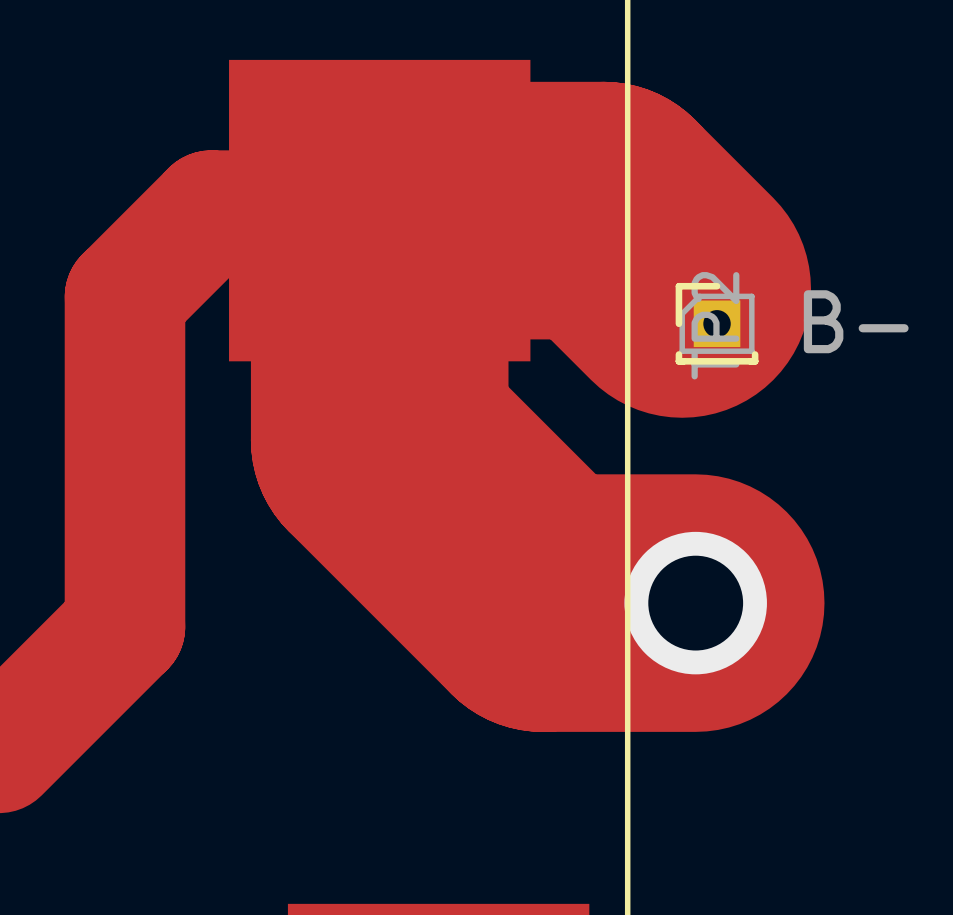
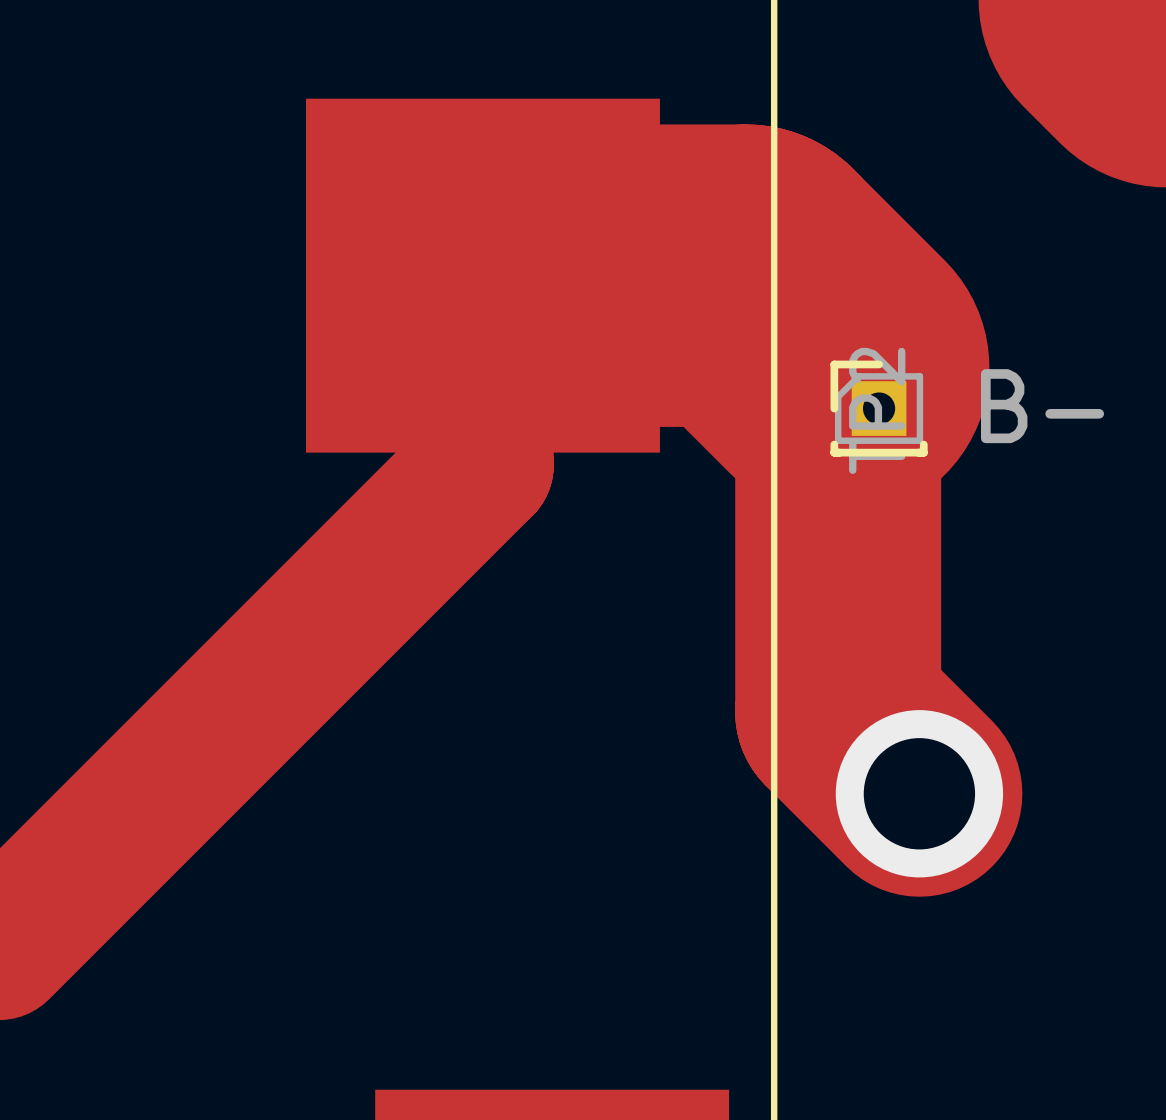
track: (379, 210) (211, 210) (124, 296) (124, 626) -> (482, 465) (183, 764)
track: none -> (838, 367) (838, 712) (919, 793)
track: (379, 372) (379, 440) (542, 603) (695, 603) -> none
via position: (695, 603) -> (919, 793)

